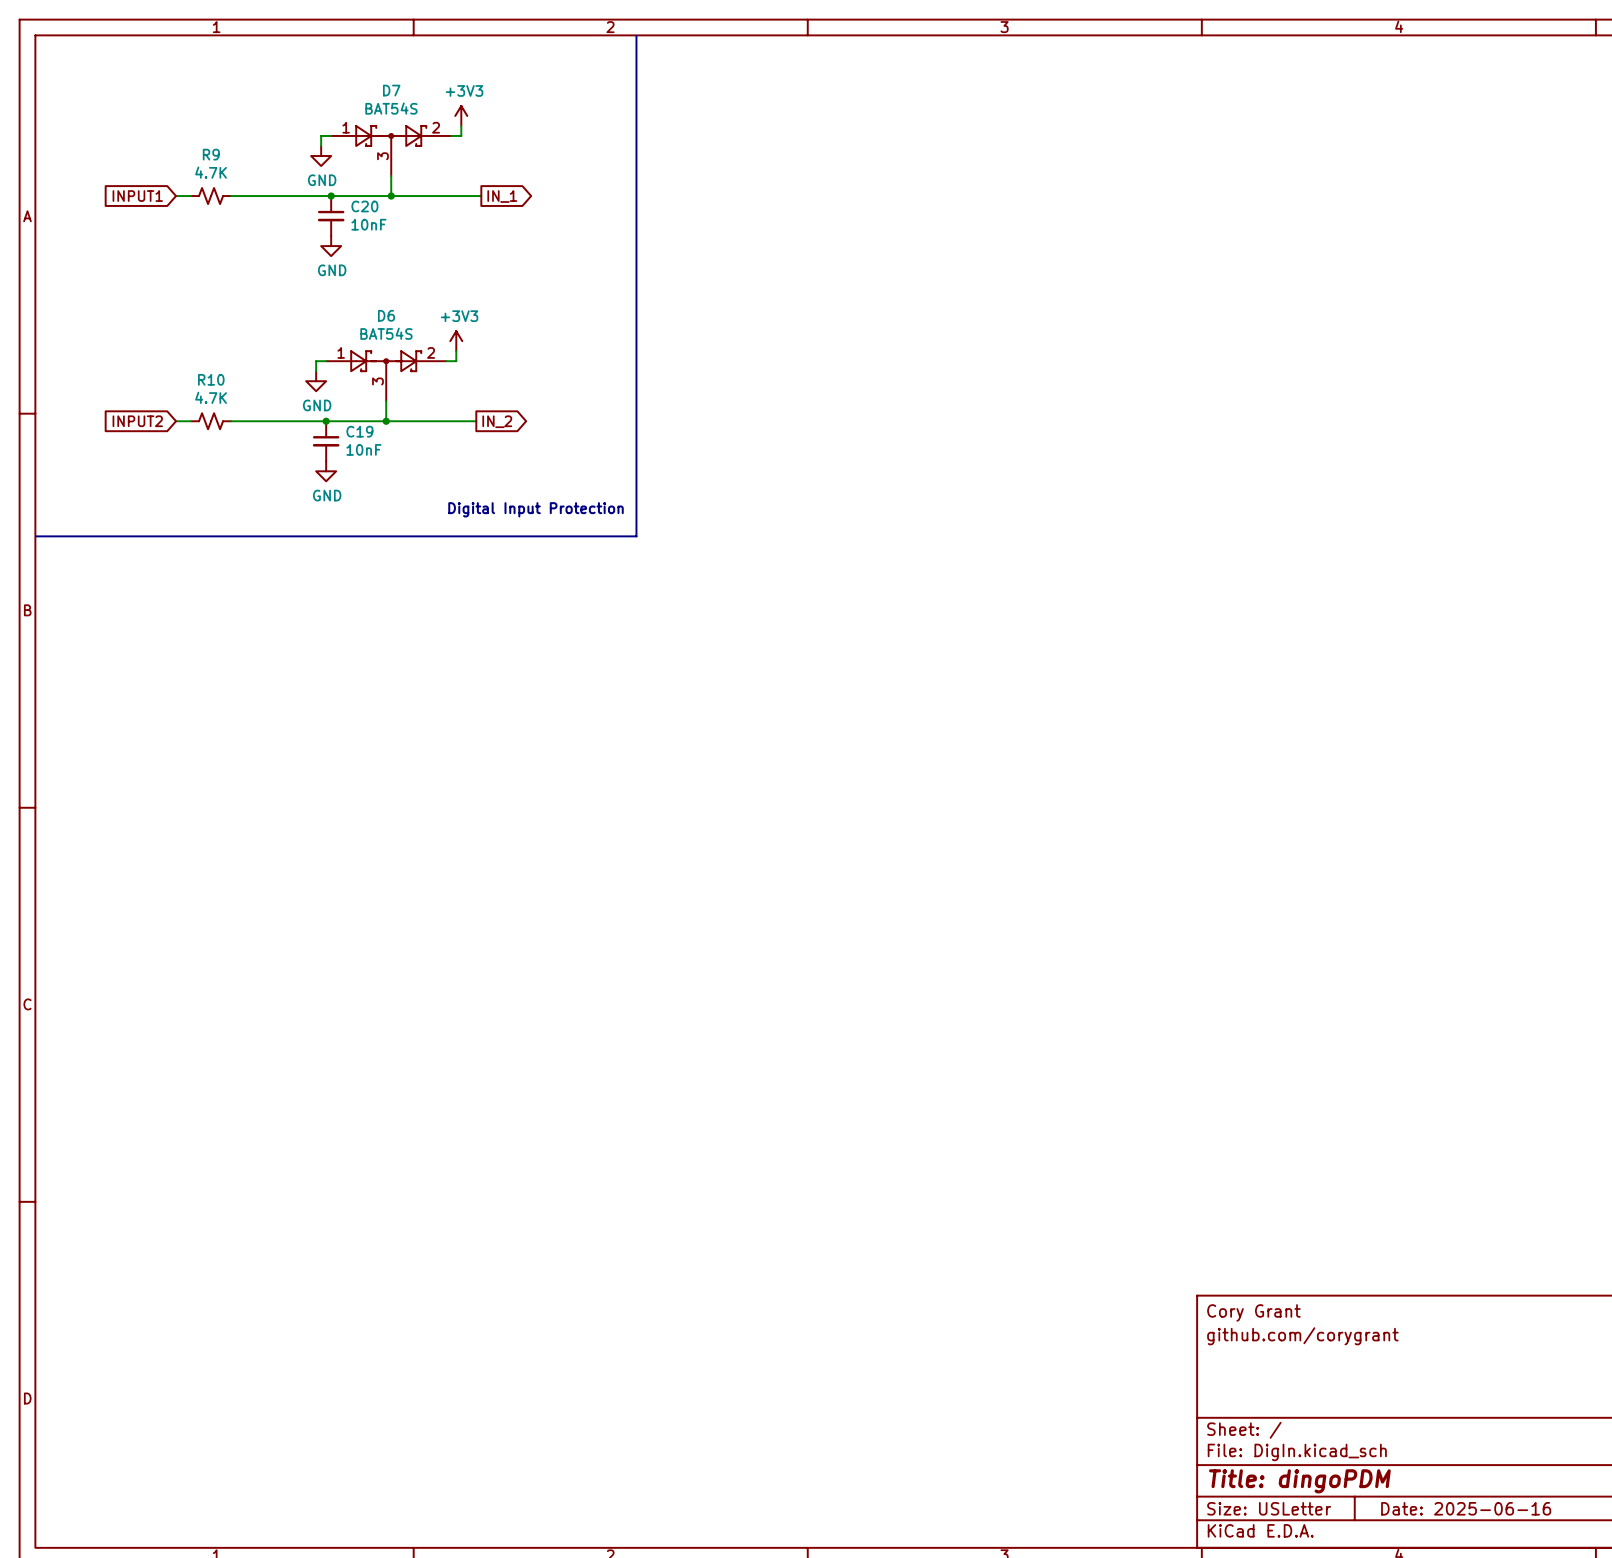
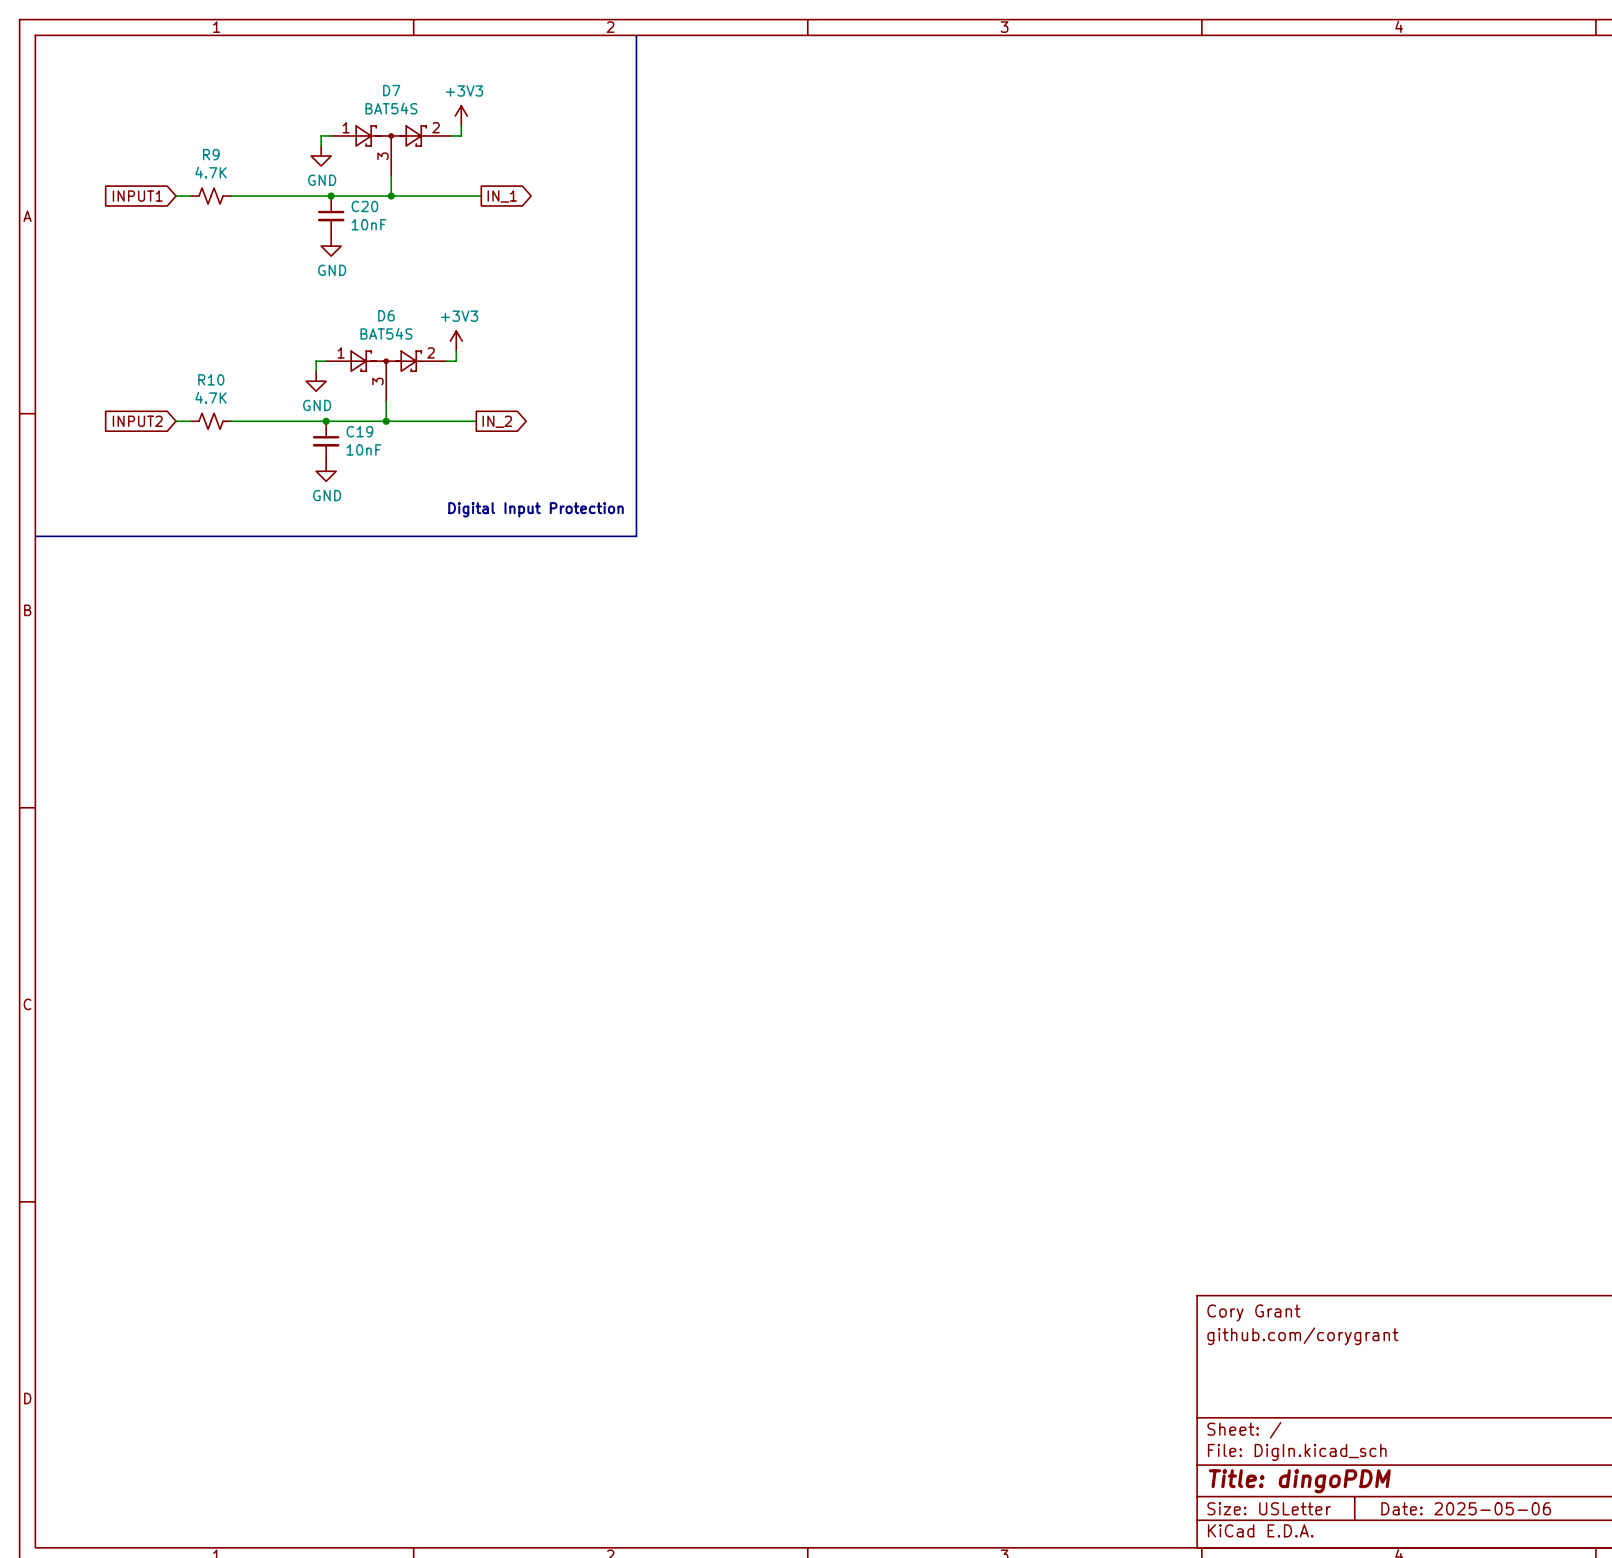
title block: Date: 2025-06-16 (1466, 1508) -> Date: 2025-05-06 (1466, 1508)

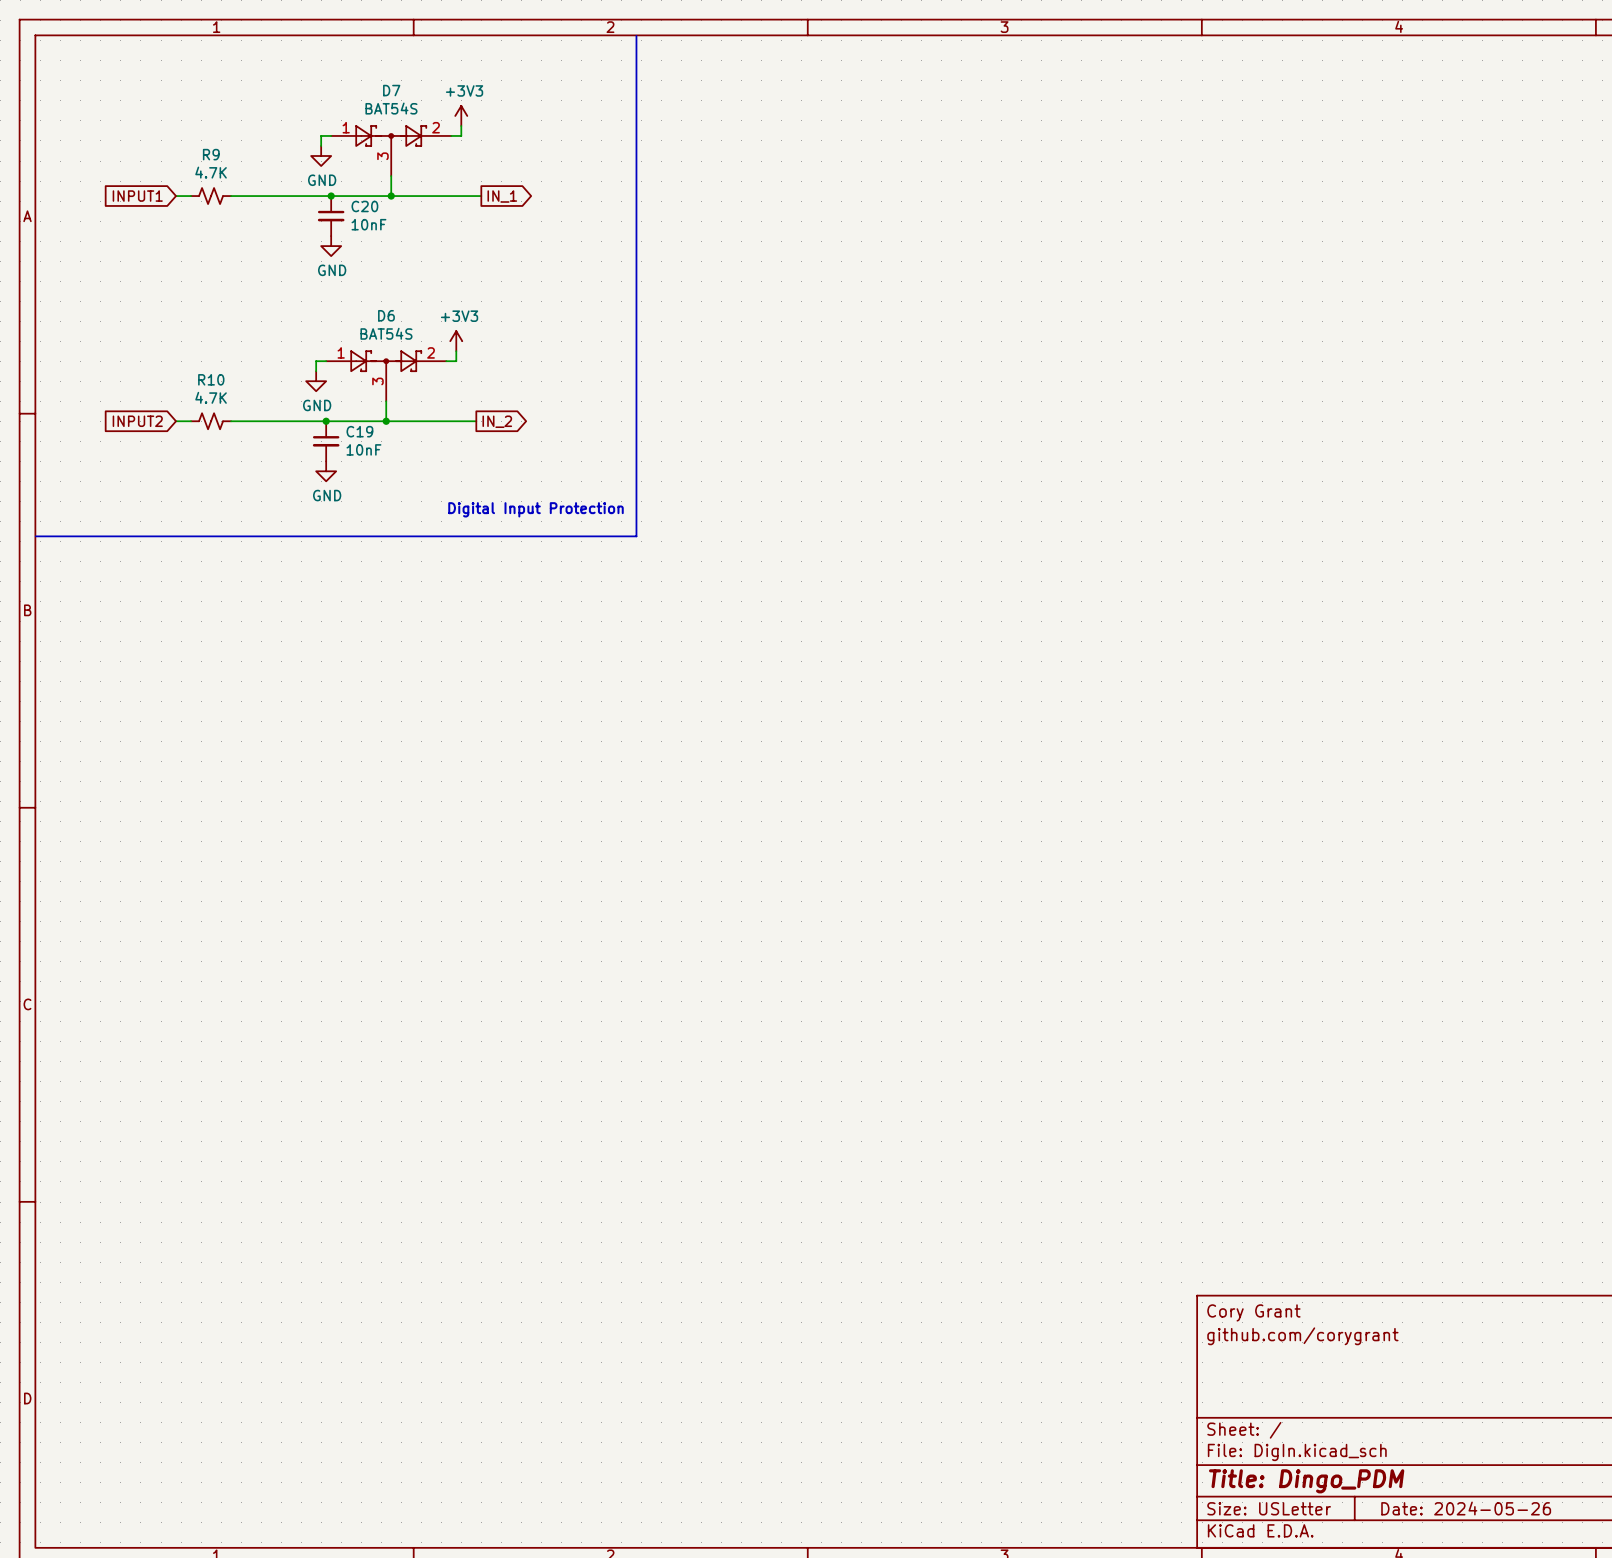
title block: Title: dingoPDM (1299, 1481) -> Title: Dingo_PDM (1306, 1481)
title block: Date: 2025-05-06 (1466, 1508) -> Date: 2024-05-26 (1466, 1508)

